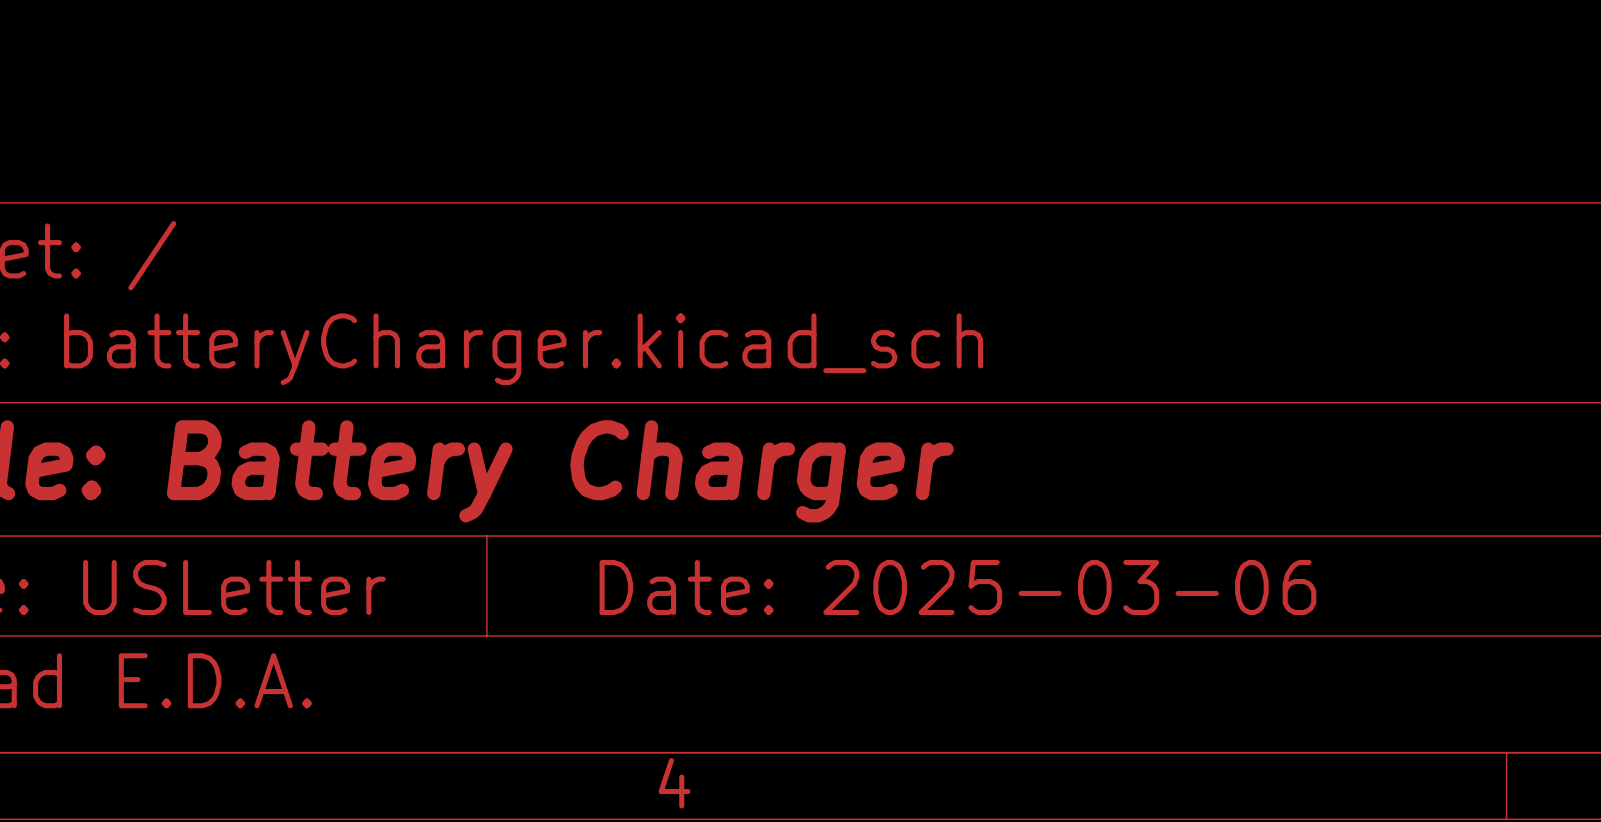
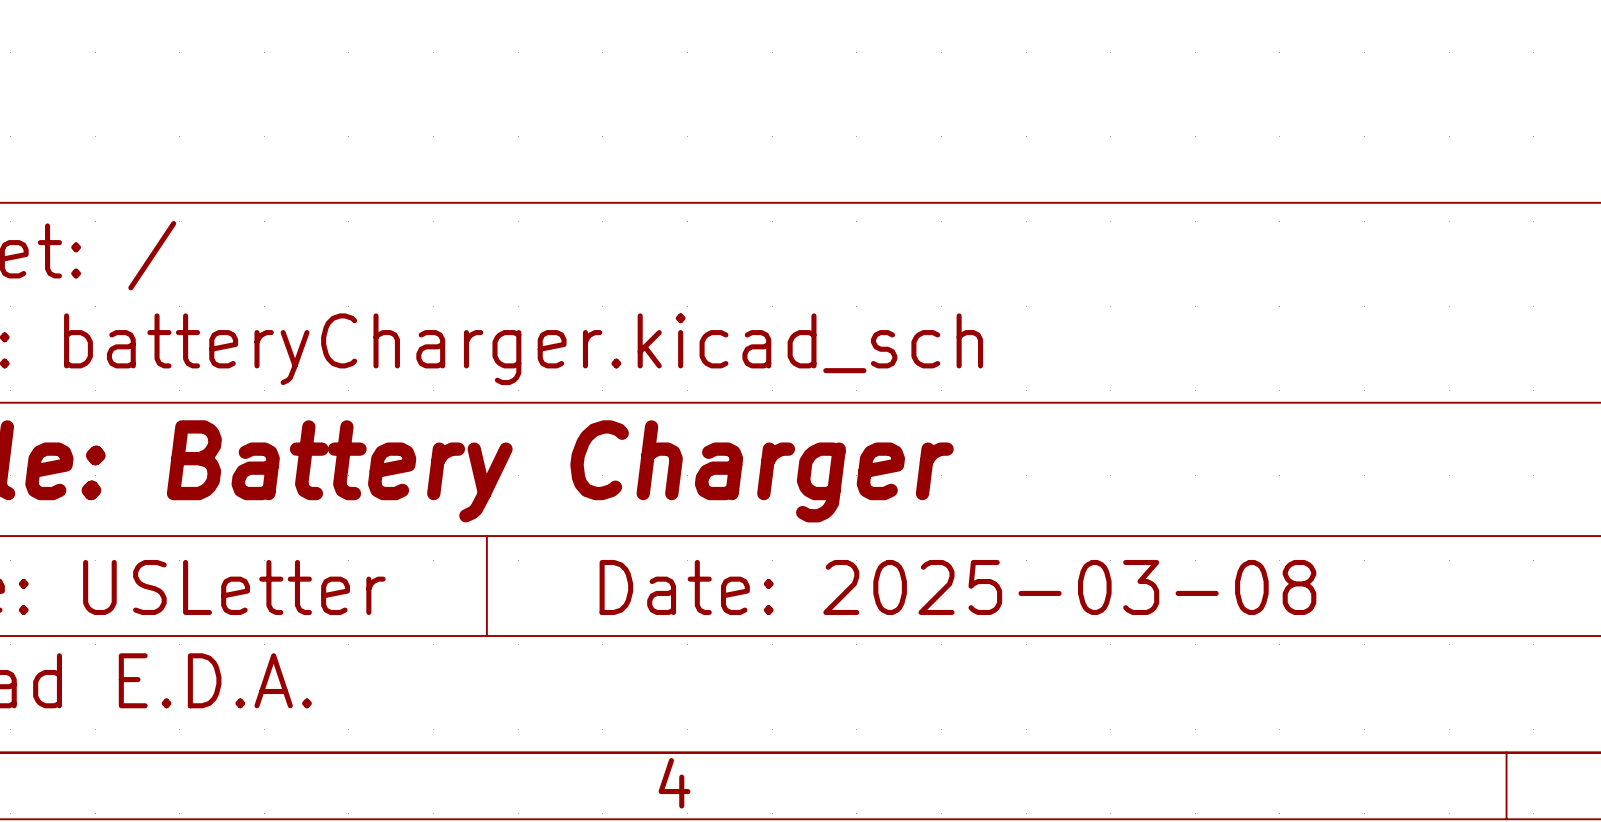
title block: Date: 2025-03-06 (957, 587) -> Date: 2025-03-08 (957, 587)

